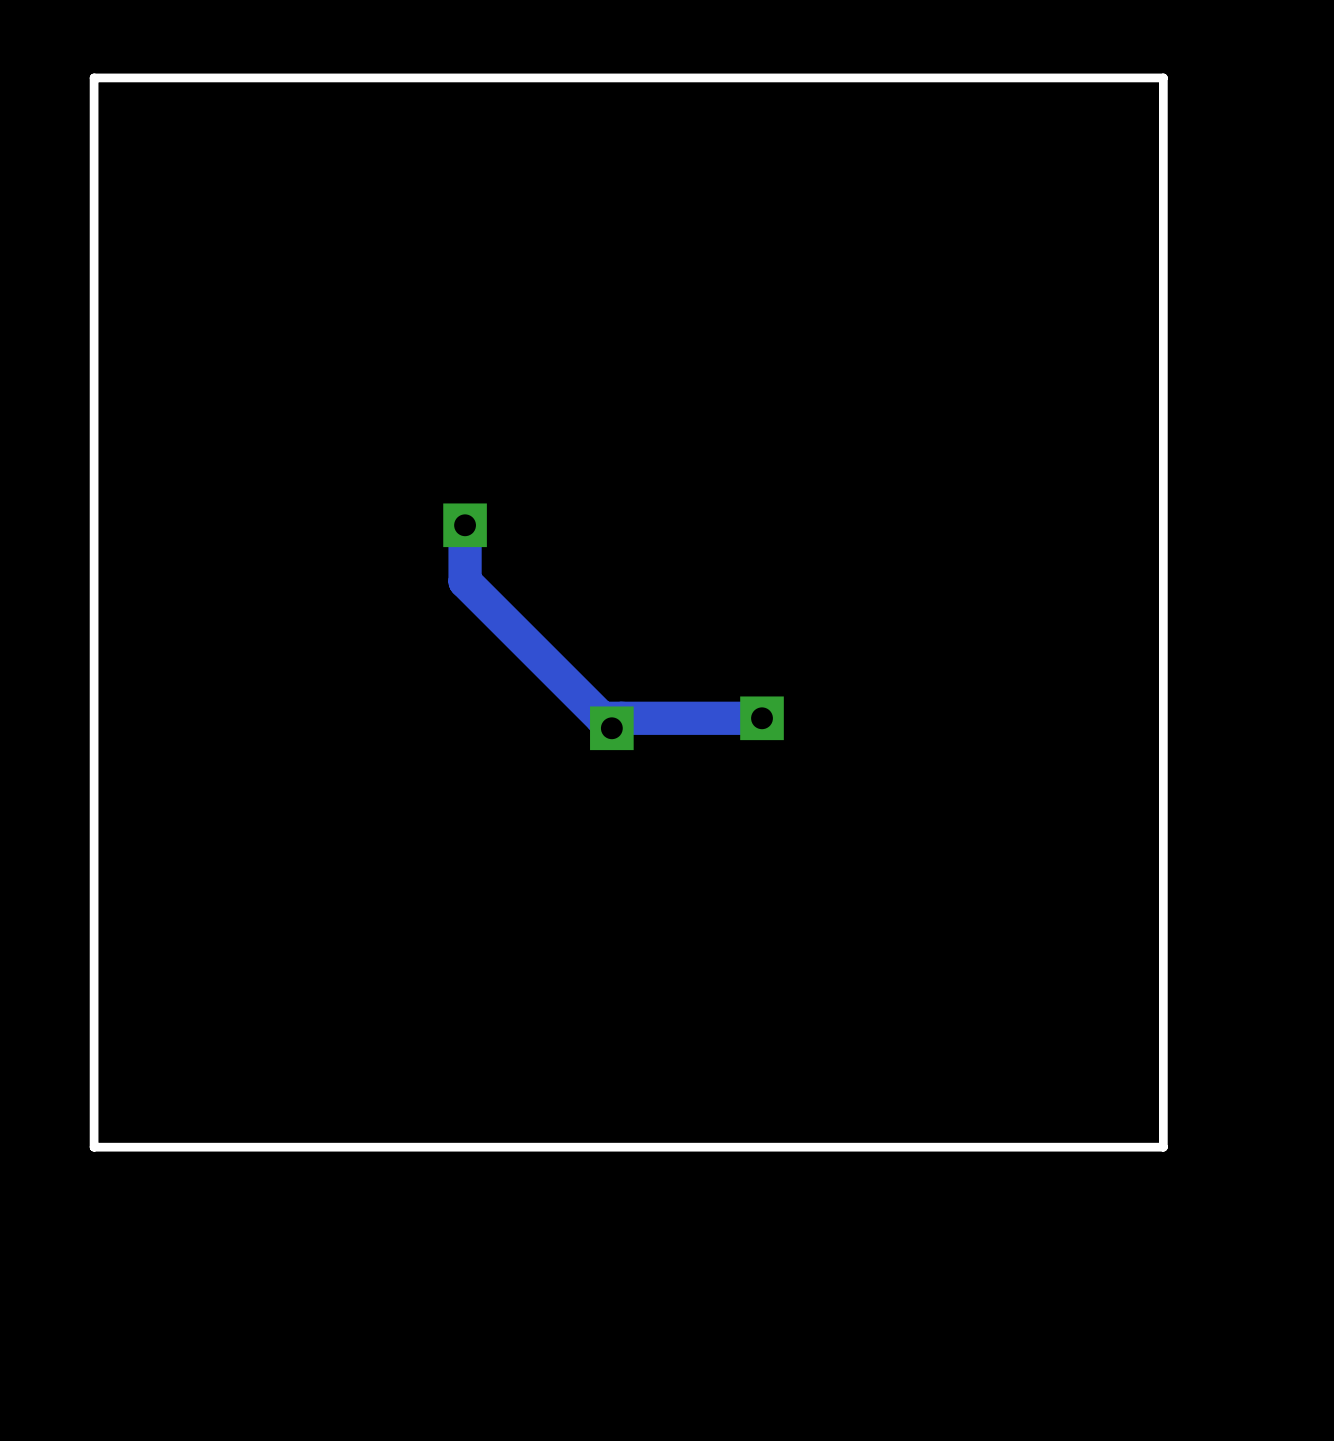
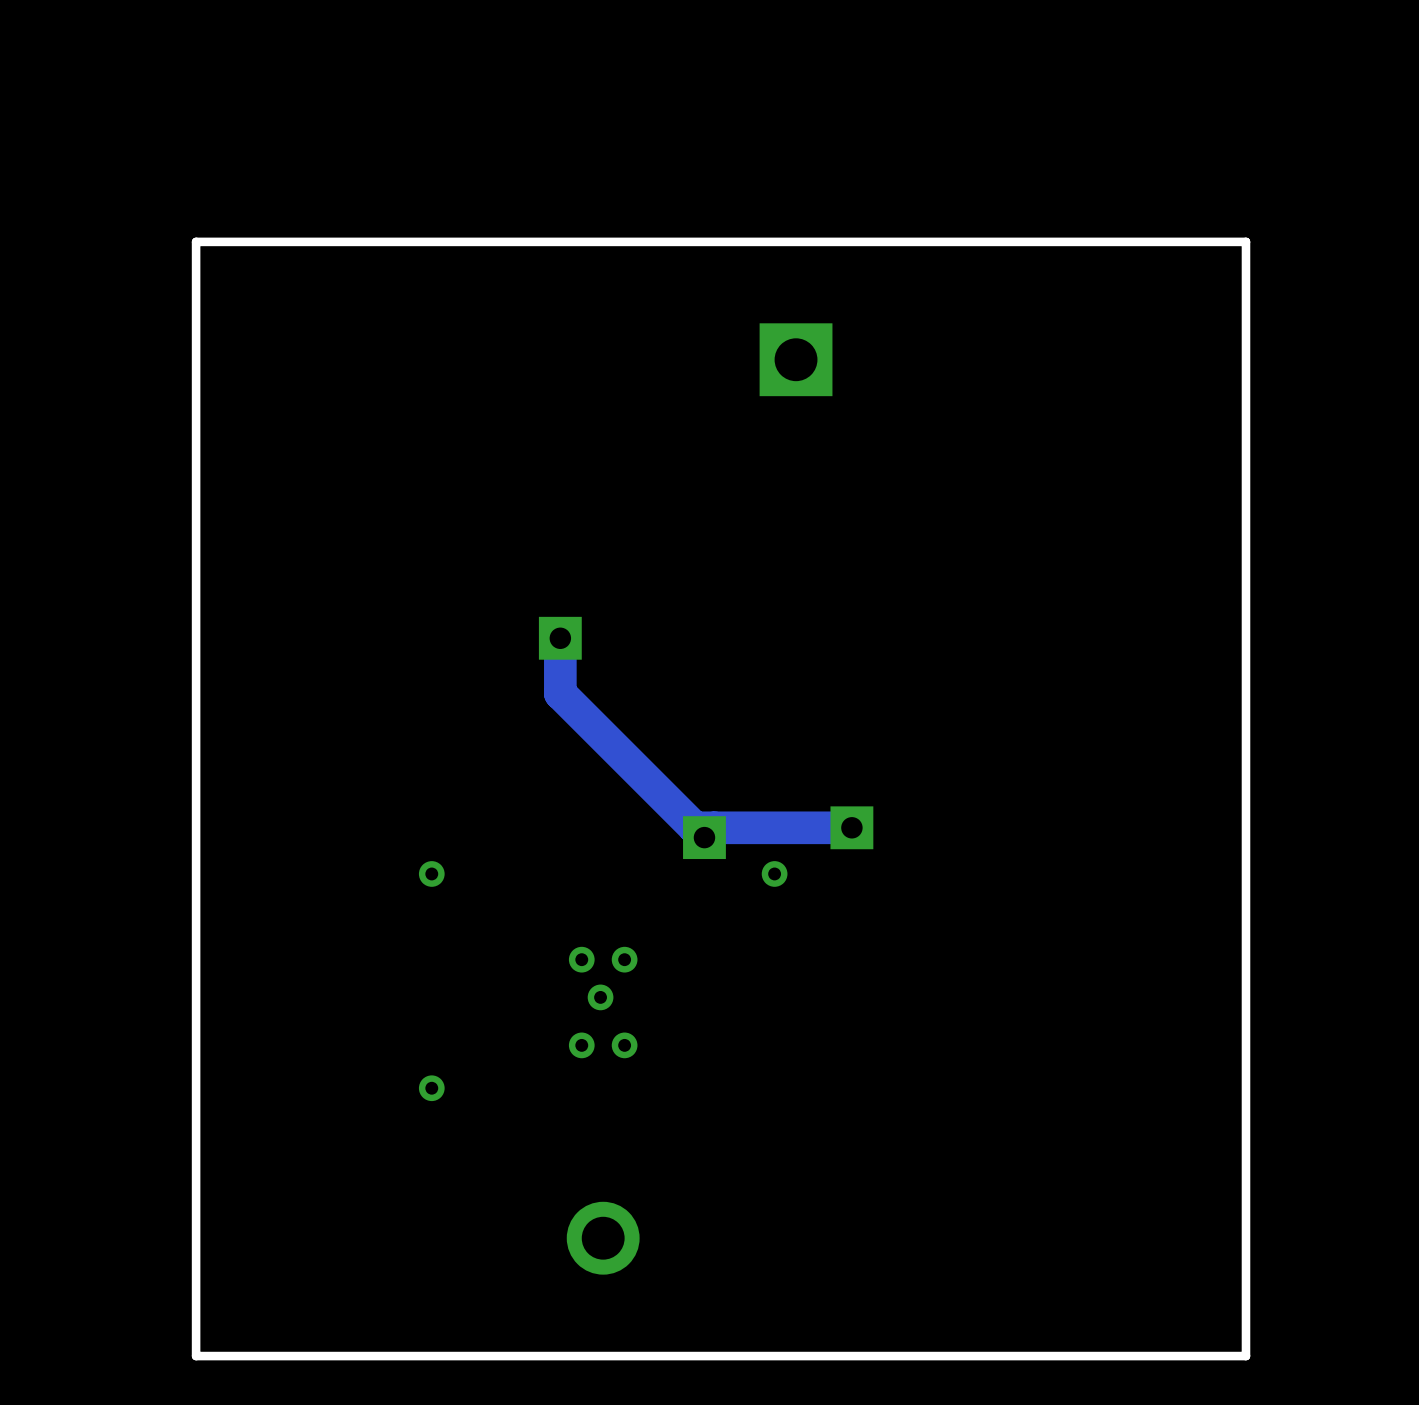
board edge: (1163, 121) (1163, 77) (94, 77) (94, 121) -> (1245, 241) (196, 241)
part: none -> (796, 359)
via: none -> (431, 873)
via: none -> (774, 873)
via: none -> (581, 959)
via: none -> (624, 959)
via: none -> (600, 997)
via: none -> (581, 1045)
via: none -> (624, 1045)
via: none -> (431, 1088)
part: none -> (603, 1238)
board edge: (1163, 1147) (94, 1147) -> (1245, 1248) (1245, 1356) (196, 1356) (196, 1248)

